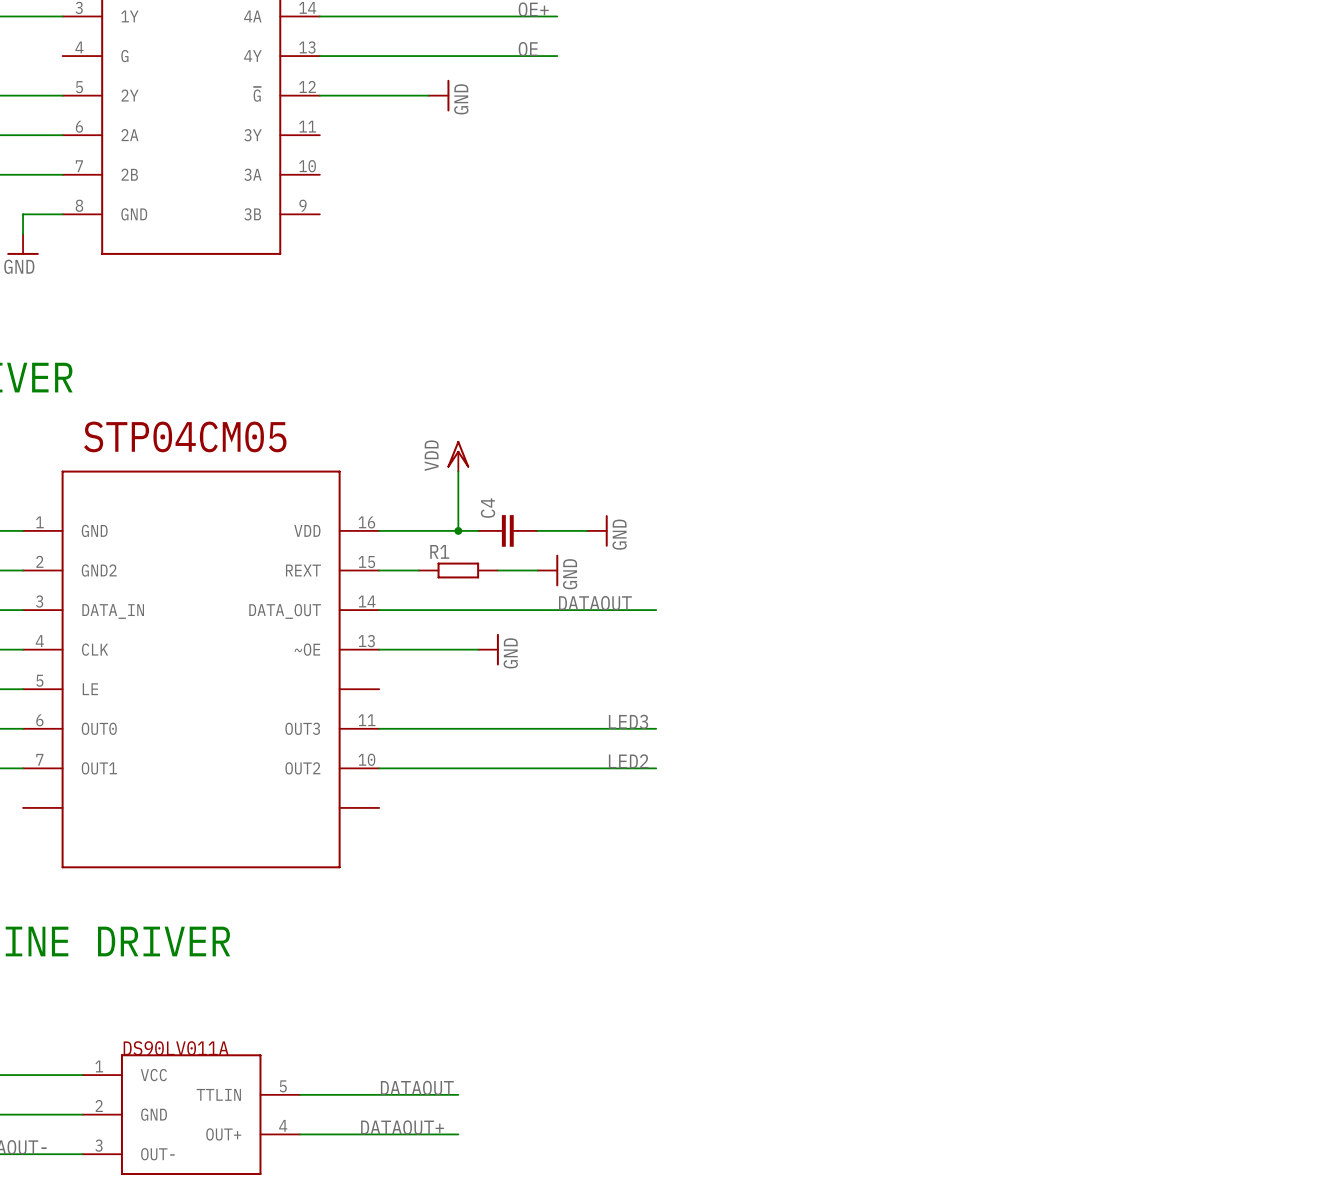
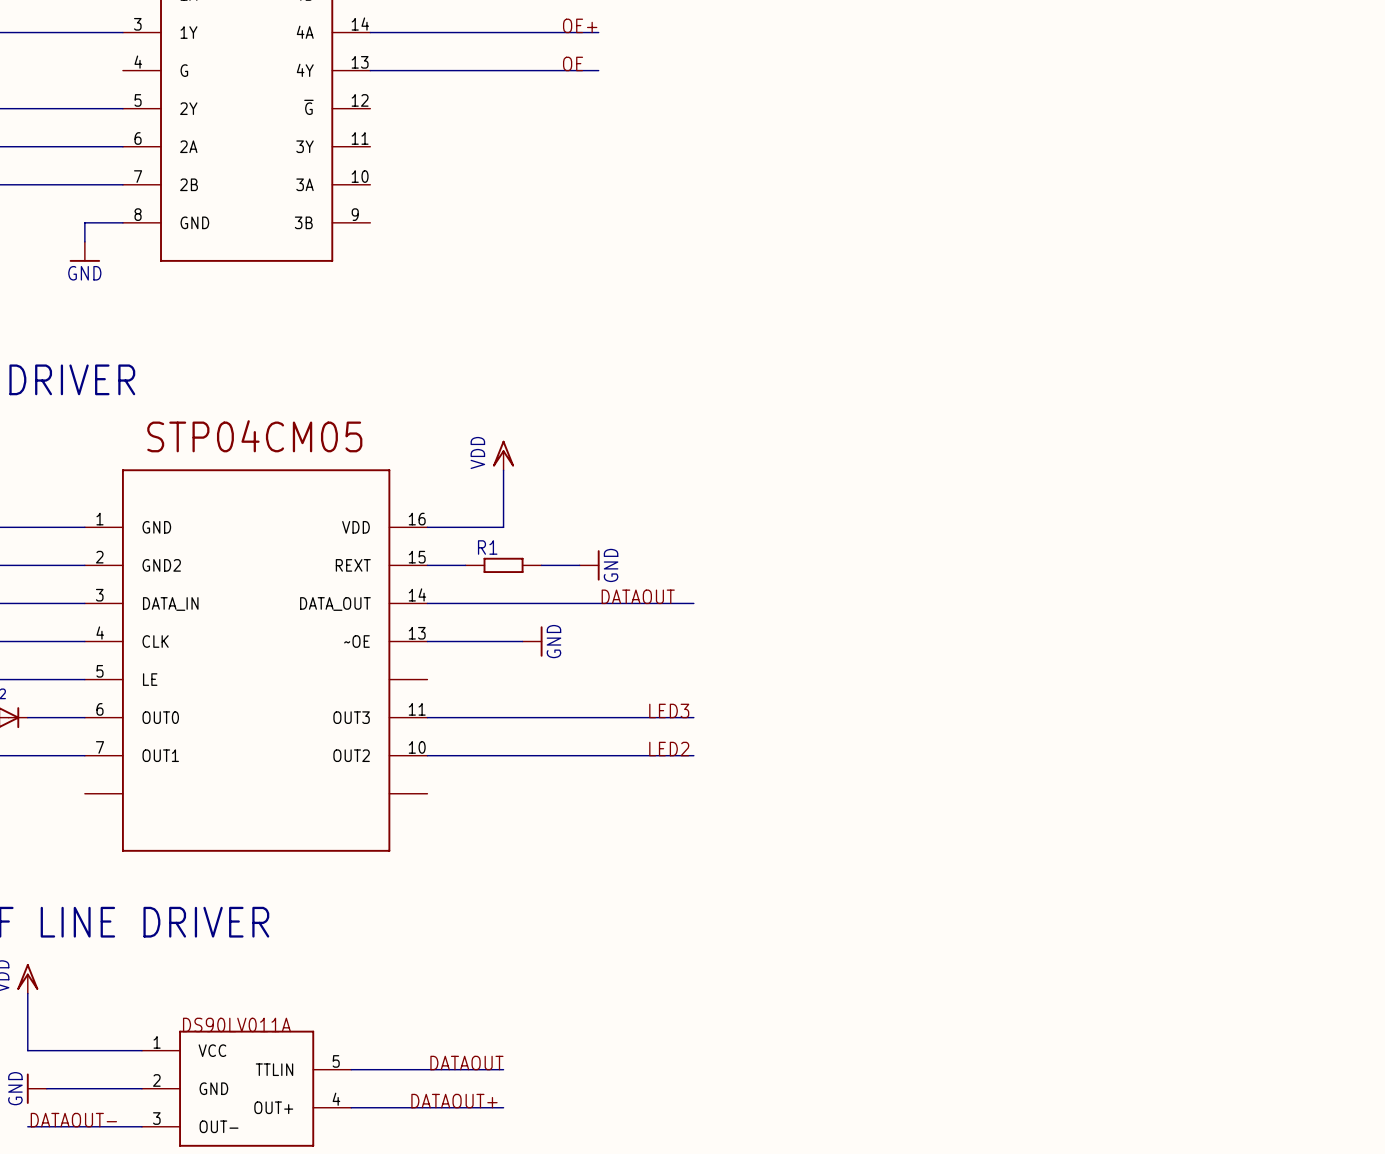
wire: (319, 95) (428, 95) -> none
power symbol: GND (439, 95) -> none
wire: (458, 530) (478, 530) -> none
junction: (458, 530) -> none
C4: (507, 530) -> none
wire: (537, 530) (586, 530) -> none
power symbol: GND (597, 530) -> none

